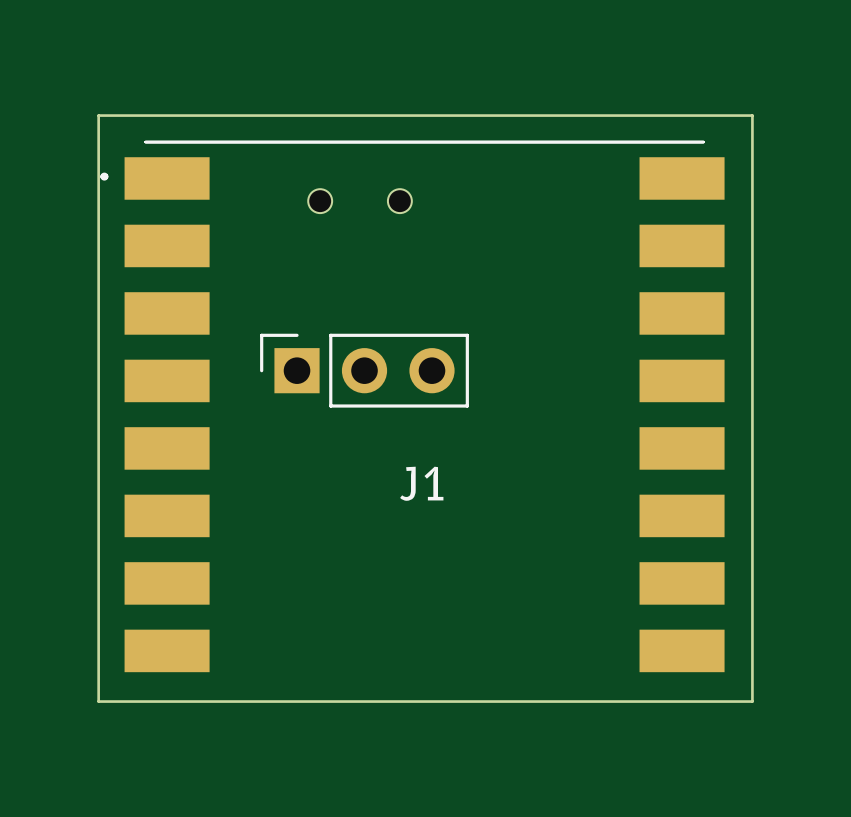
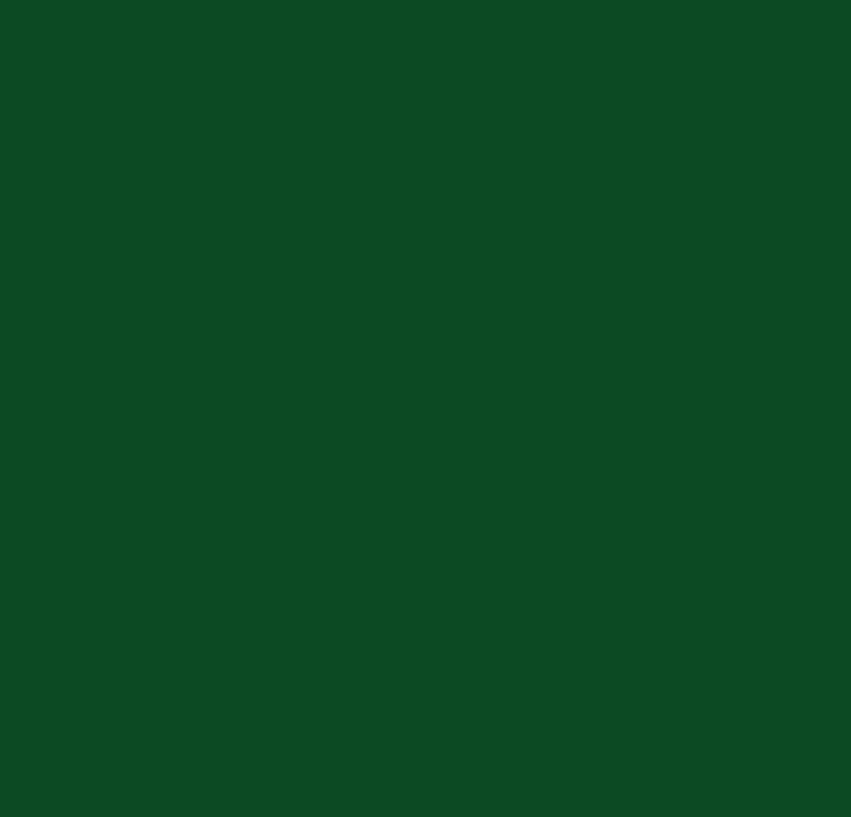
board edge: (98, 115) (98, 701) (752, 701) (752, 115) (98, 115) -> none
part: (360, 201) -> none
part: (364, 370) -> none
J1: (412, 406) -> none

